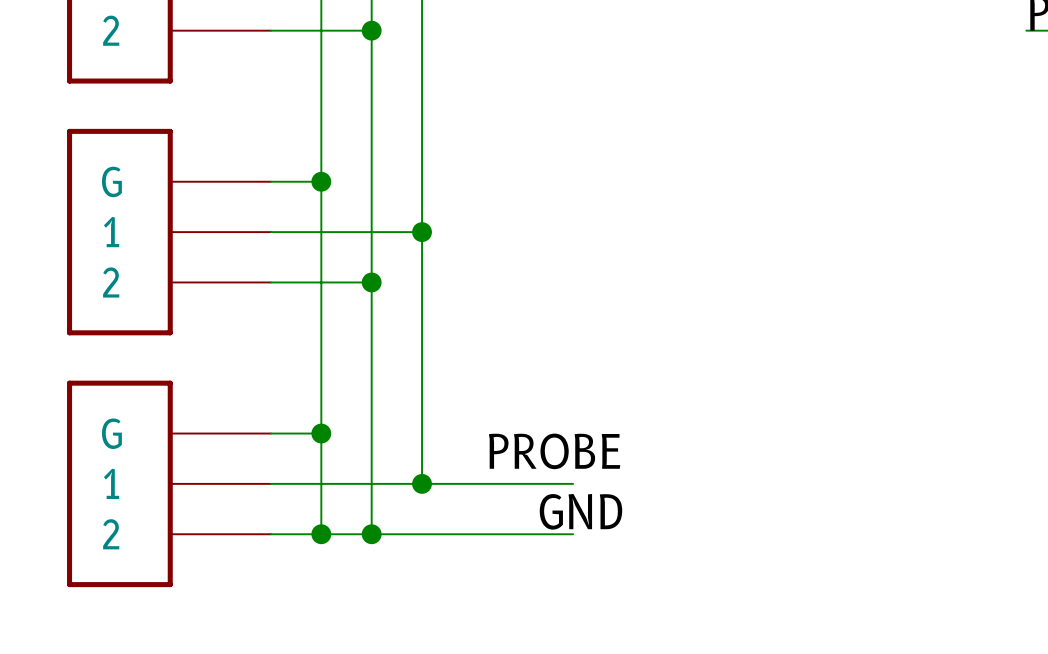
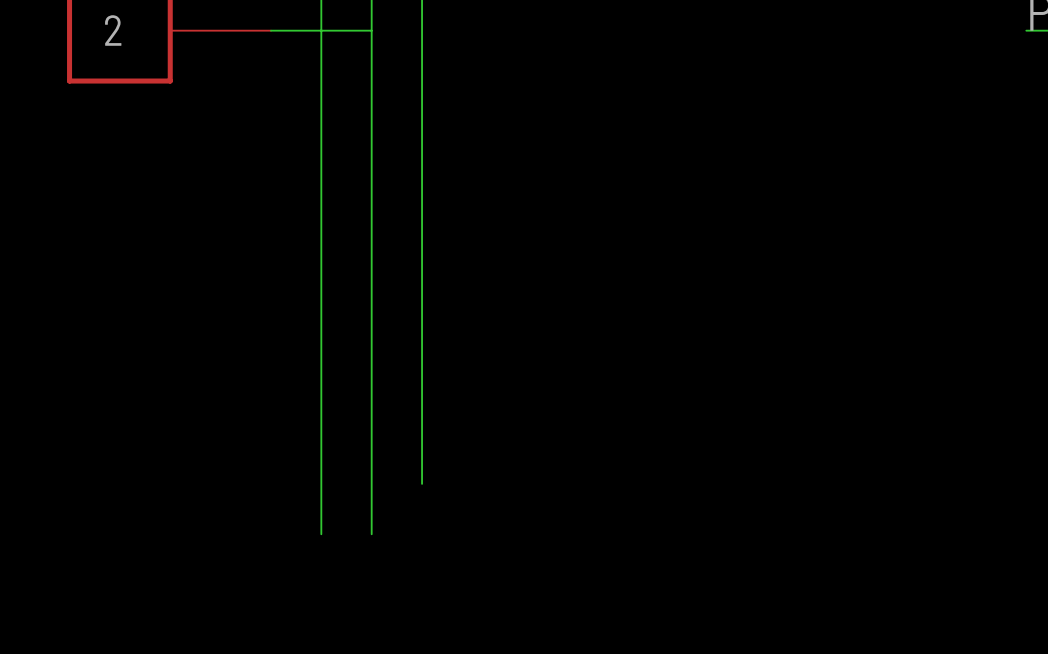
junction: (371, 30) -> none
wire: (270, 181) (321, 181) -> none
junction: (321, 181) -> none
part: (168, 232) -> none
wire: (270, 232) (422, 232) -> none
junction: (422, 232) -> none
wire: (270, 282) (371, 282) -> none
junction: (371, 282) -> none
wire: (270, 433) (321, 433) -> none
junction: (321, 433) -> none
label: PROBE (554, 451) -> none
part: (168, 483) -> none
wire: (270, 483) (573, 483) -> none
junction: (422, 483) -> none
label: GND (580, 511) -> none
wire: (270, 534) (573, 534) -> none
junction: (321, 534) -> none
junction: (371, 534) -> none

